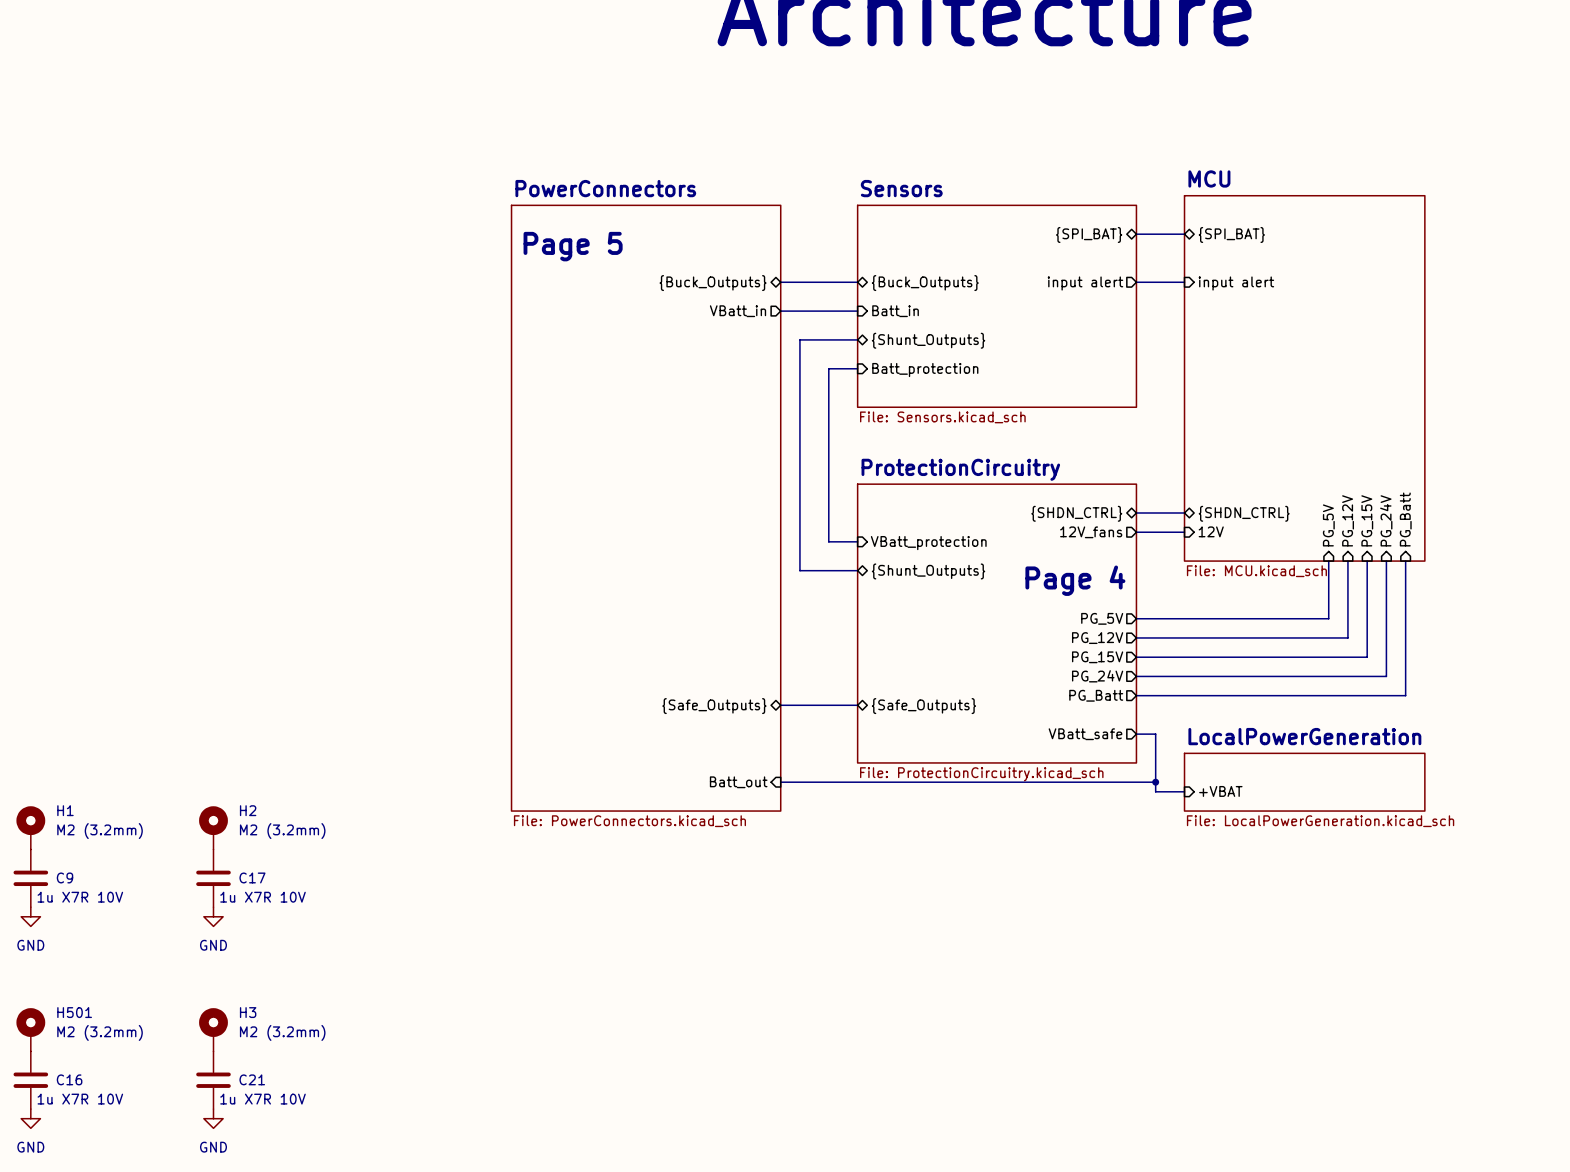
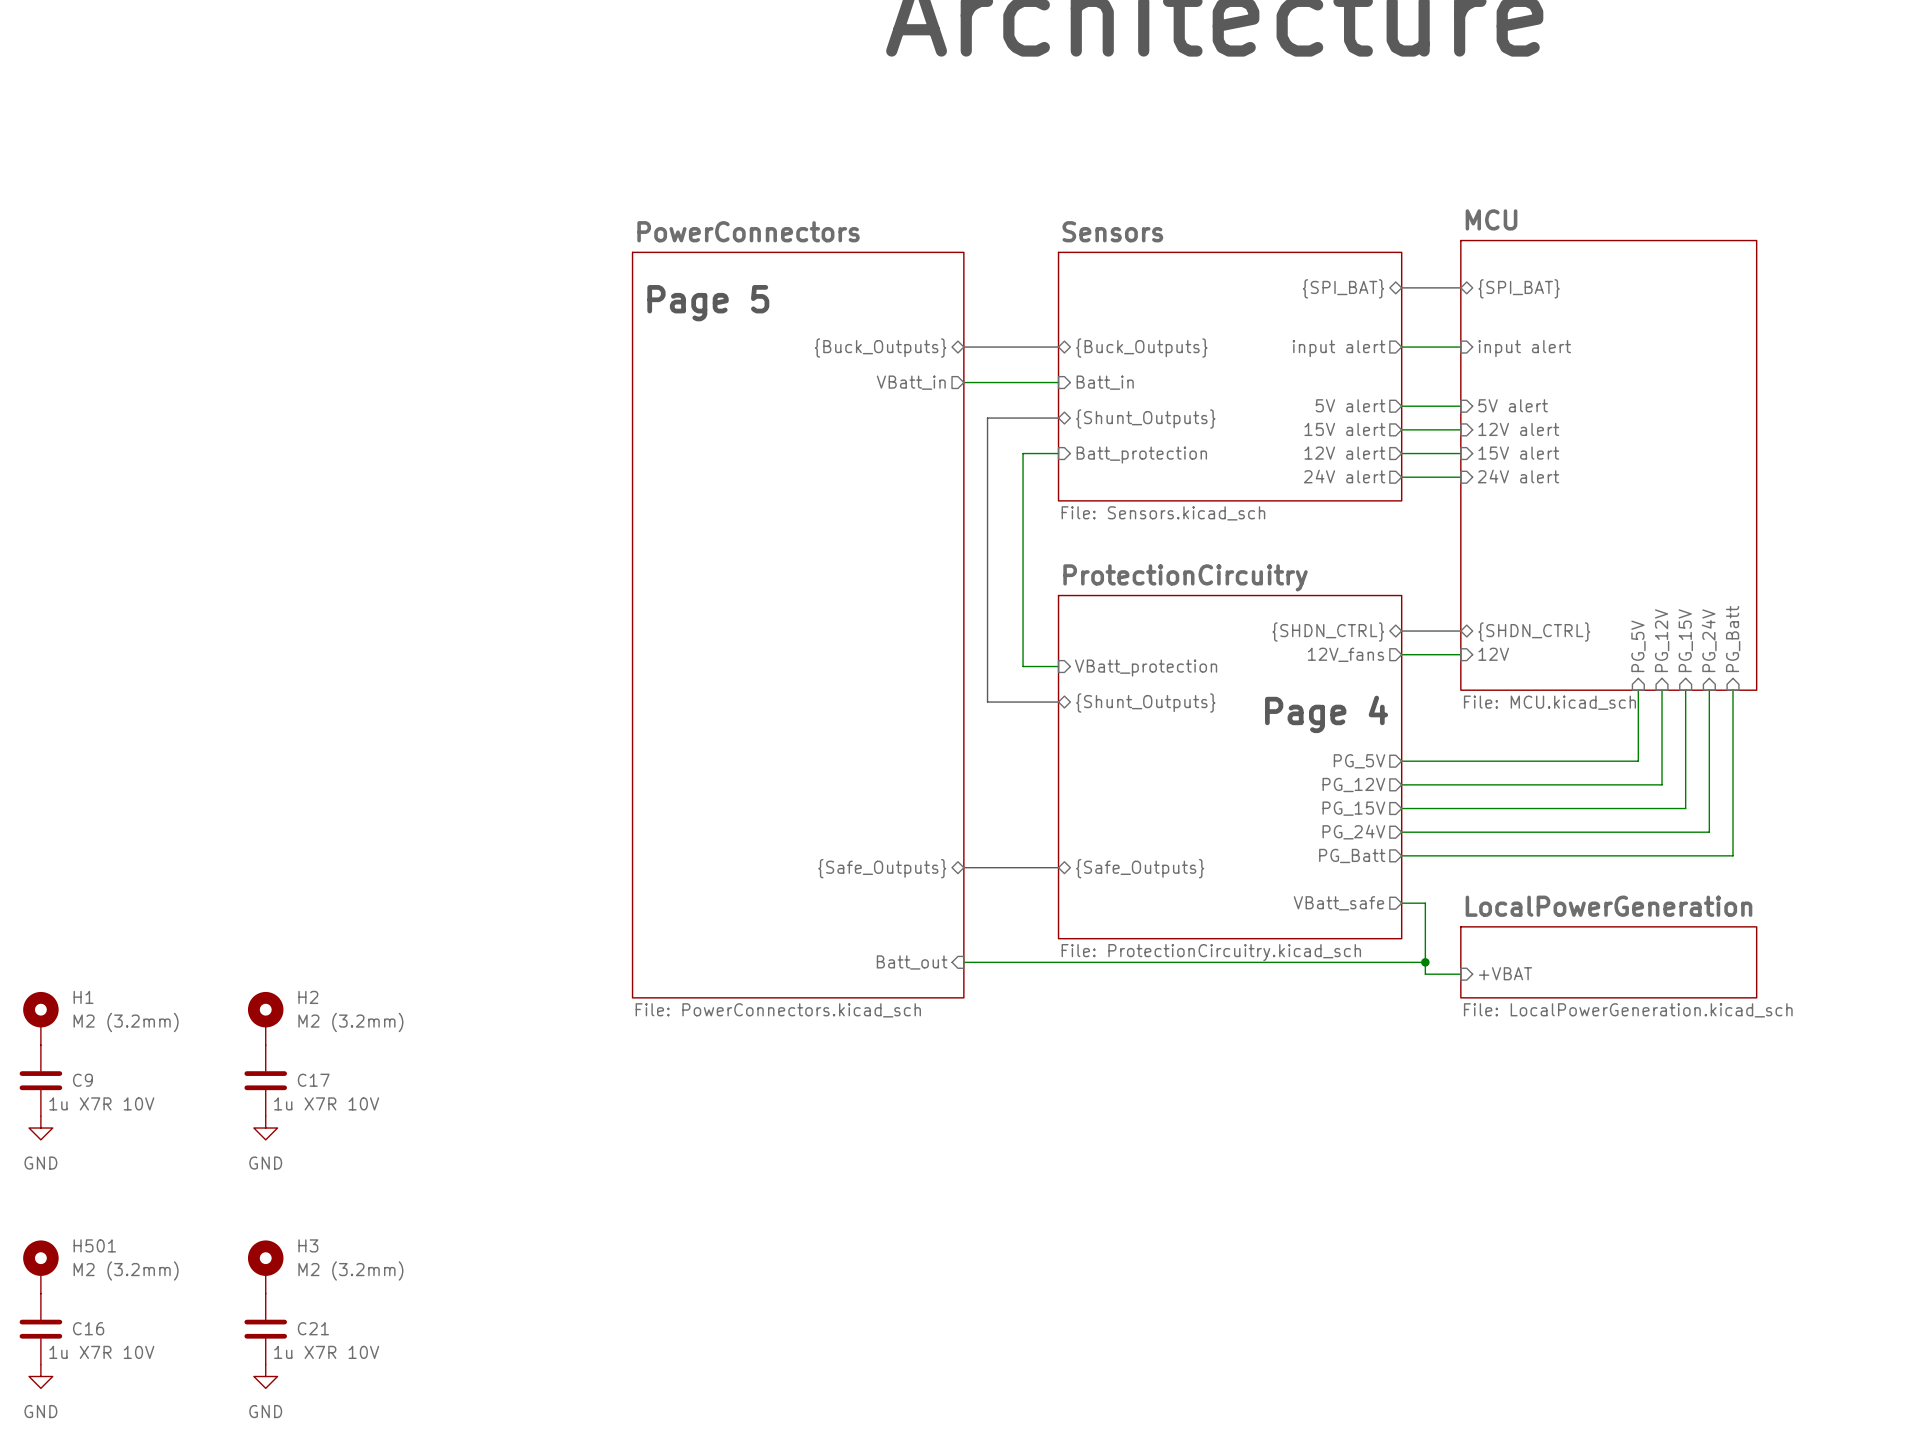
sheet pin: none -> 5V alert (1350, 405)
sheet pin: none -> 5V alert (1513, 405)
wire: none -> (1401, 406) (1460, 406)
sheet pin: none -> 15V alert (1344, 429)
wire: none -> (1401, 429) (1460, 429)
sheet pin: none -> 12V alert (1518, 429)
sheet pin: none -> 12V alert (1344, 453)
wire: none -> (1401, 453) (1460, 453)
sheet pin: none -> 15V alert (1518, 453)
sheet pin: none -> 24V alert (1344, 476)
sheet pin: none -> 24V alert (1518, 476)
wire: none -> (1401, 477) (1460, 477)

